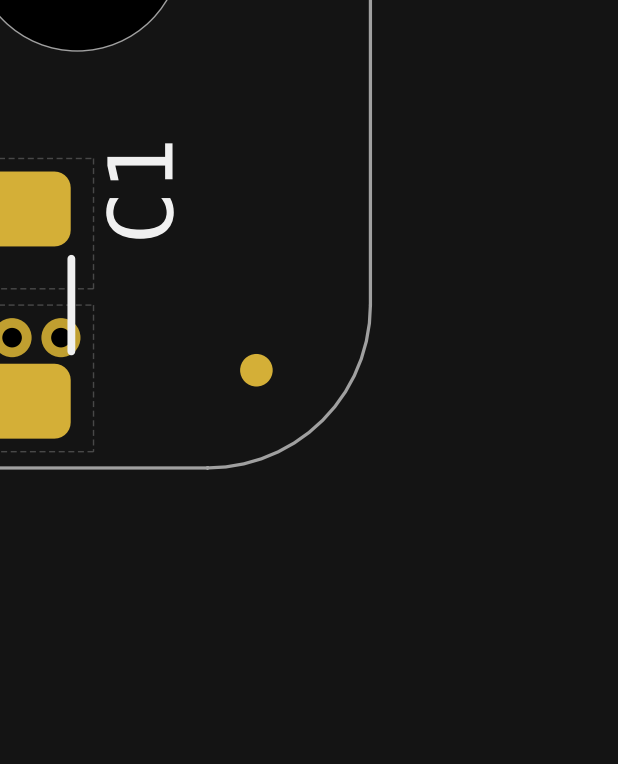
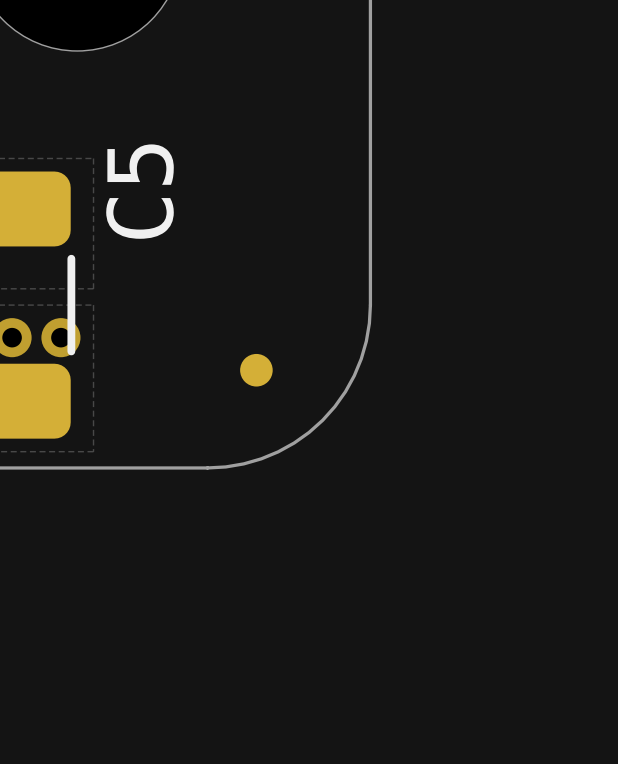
C1 name: C1 (139, 191) -> C5 (139, 191)

